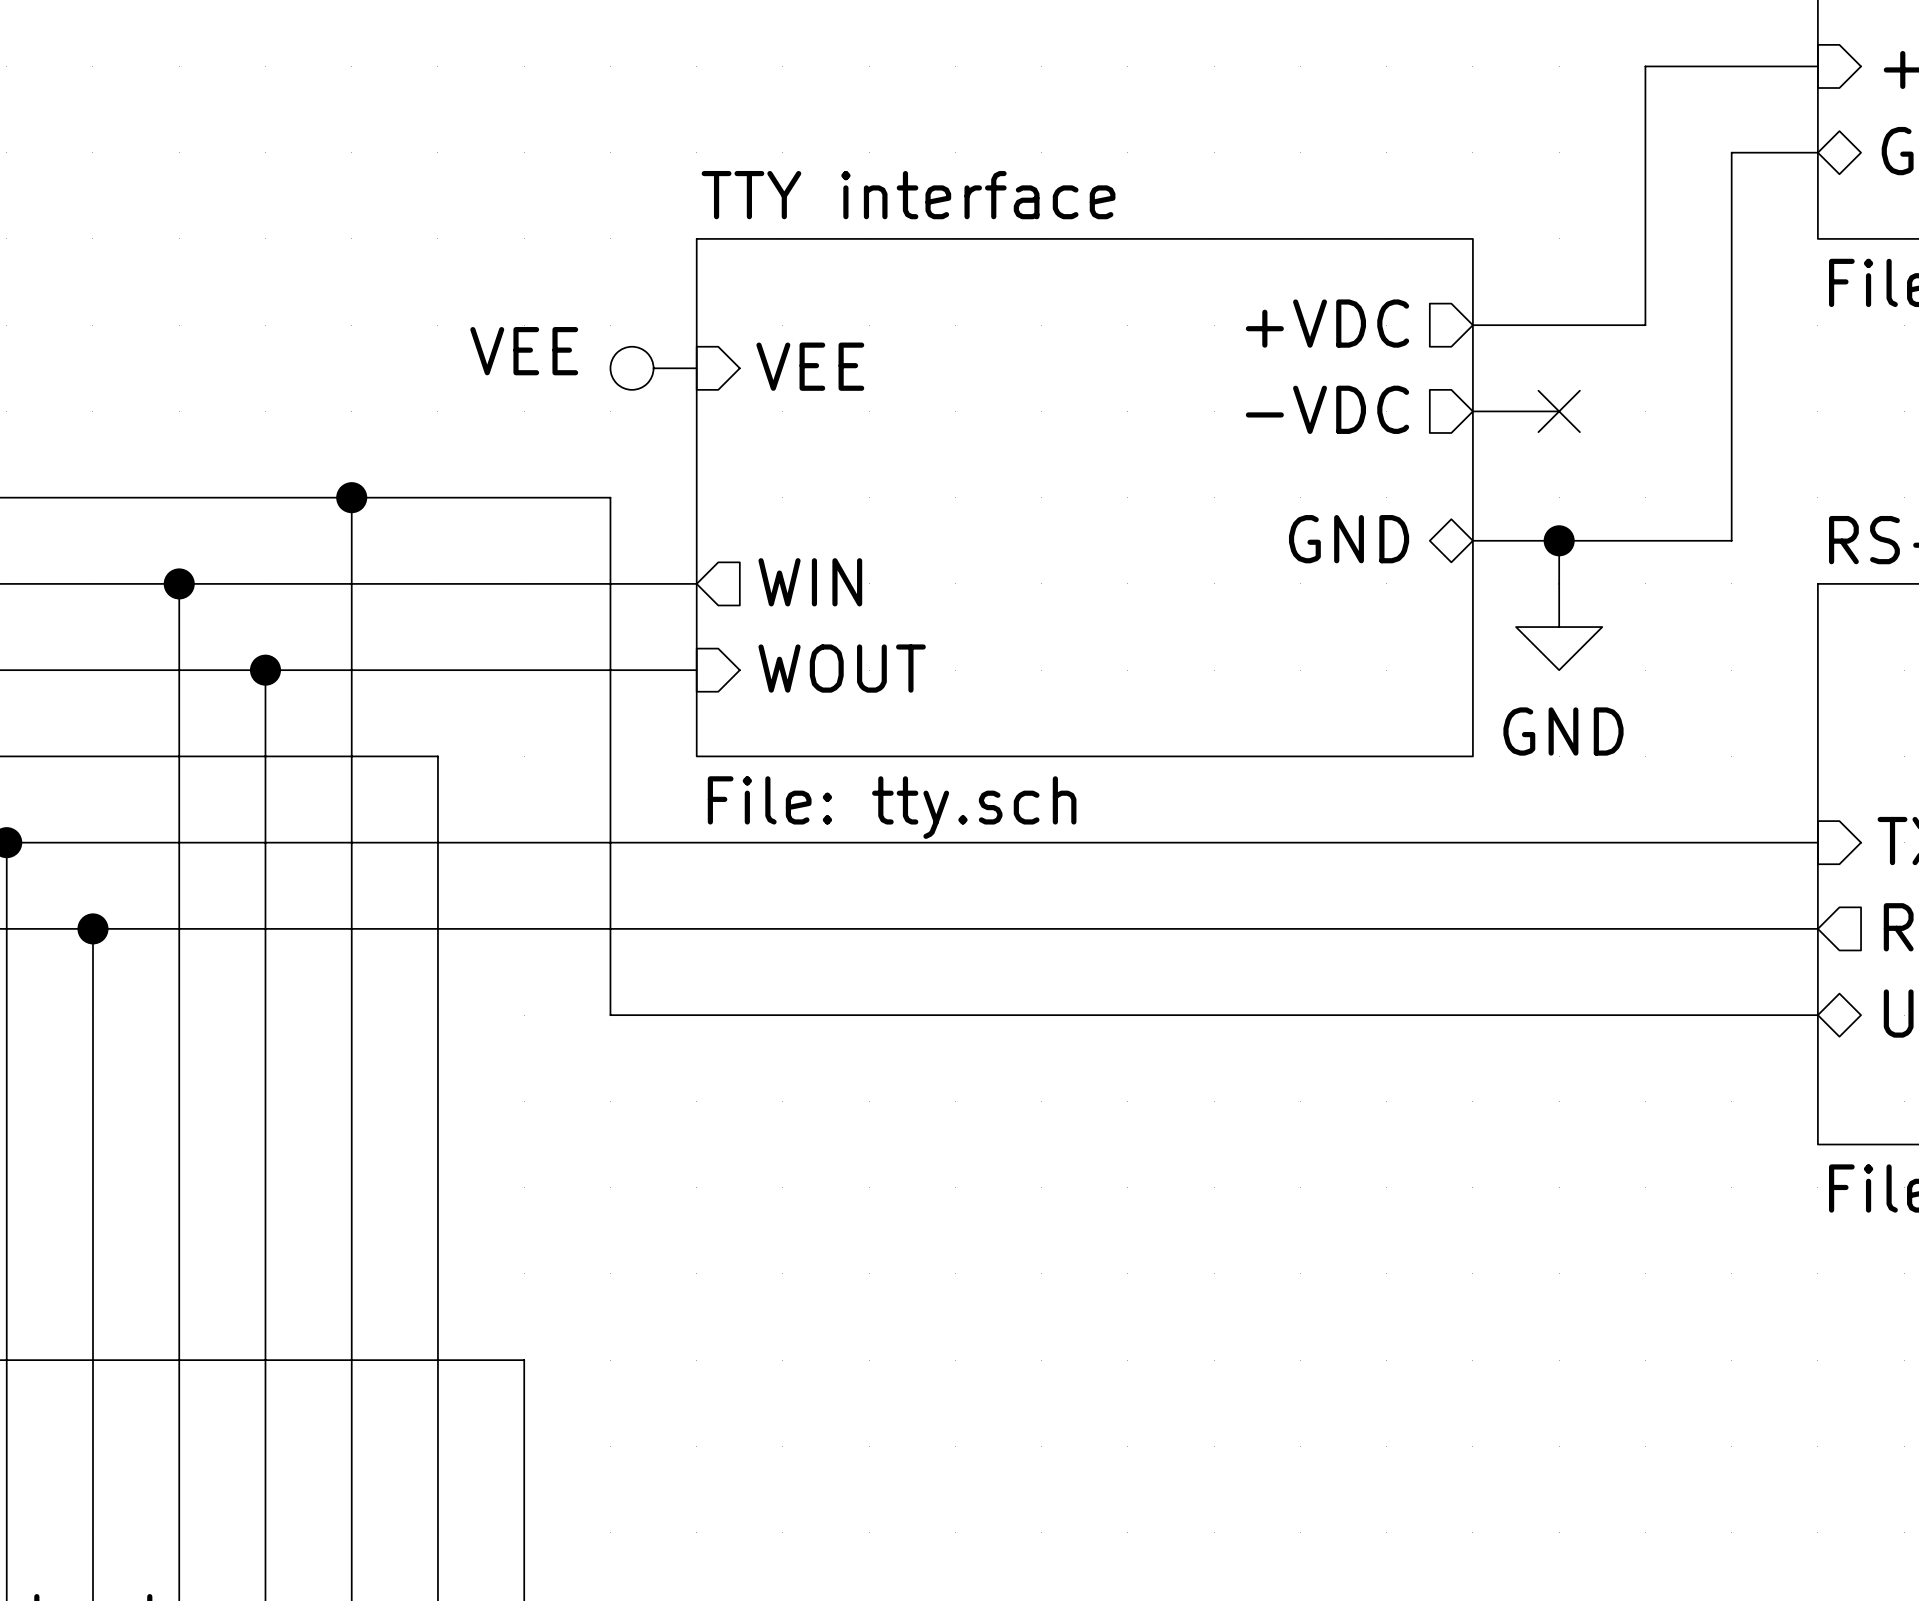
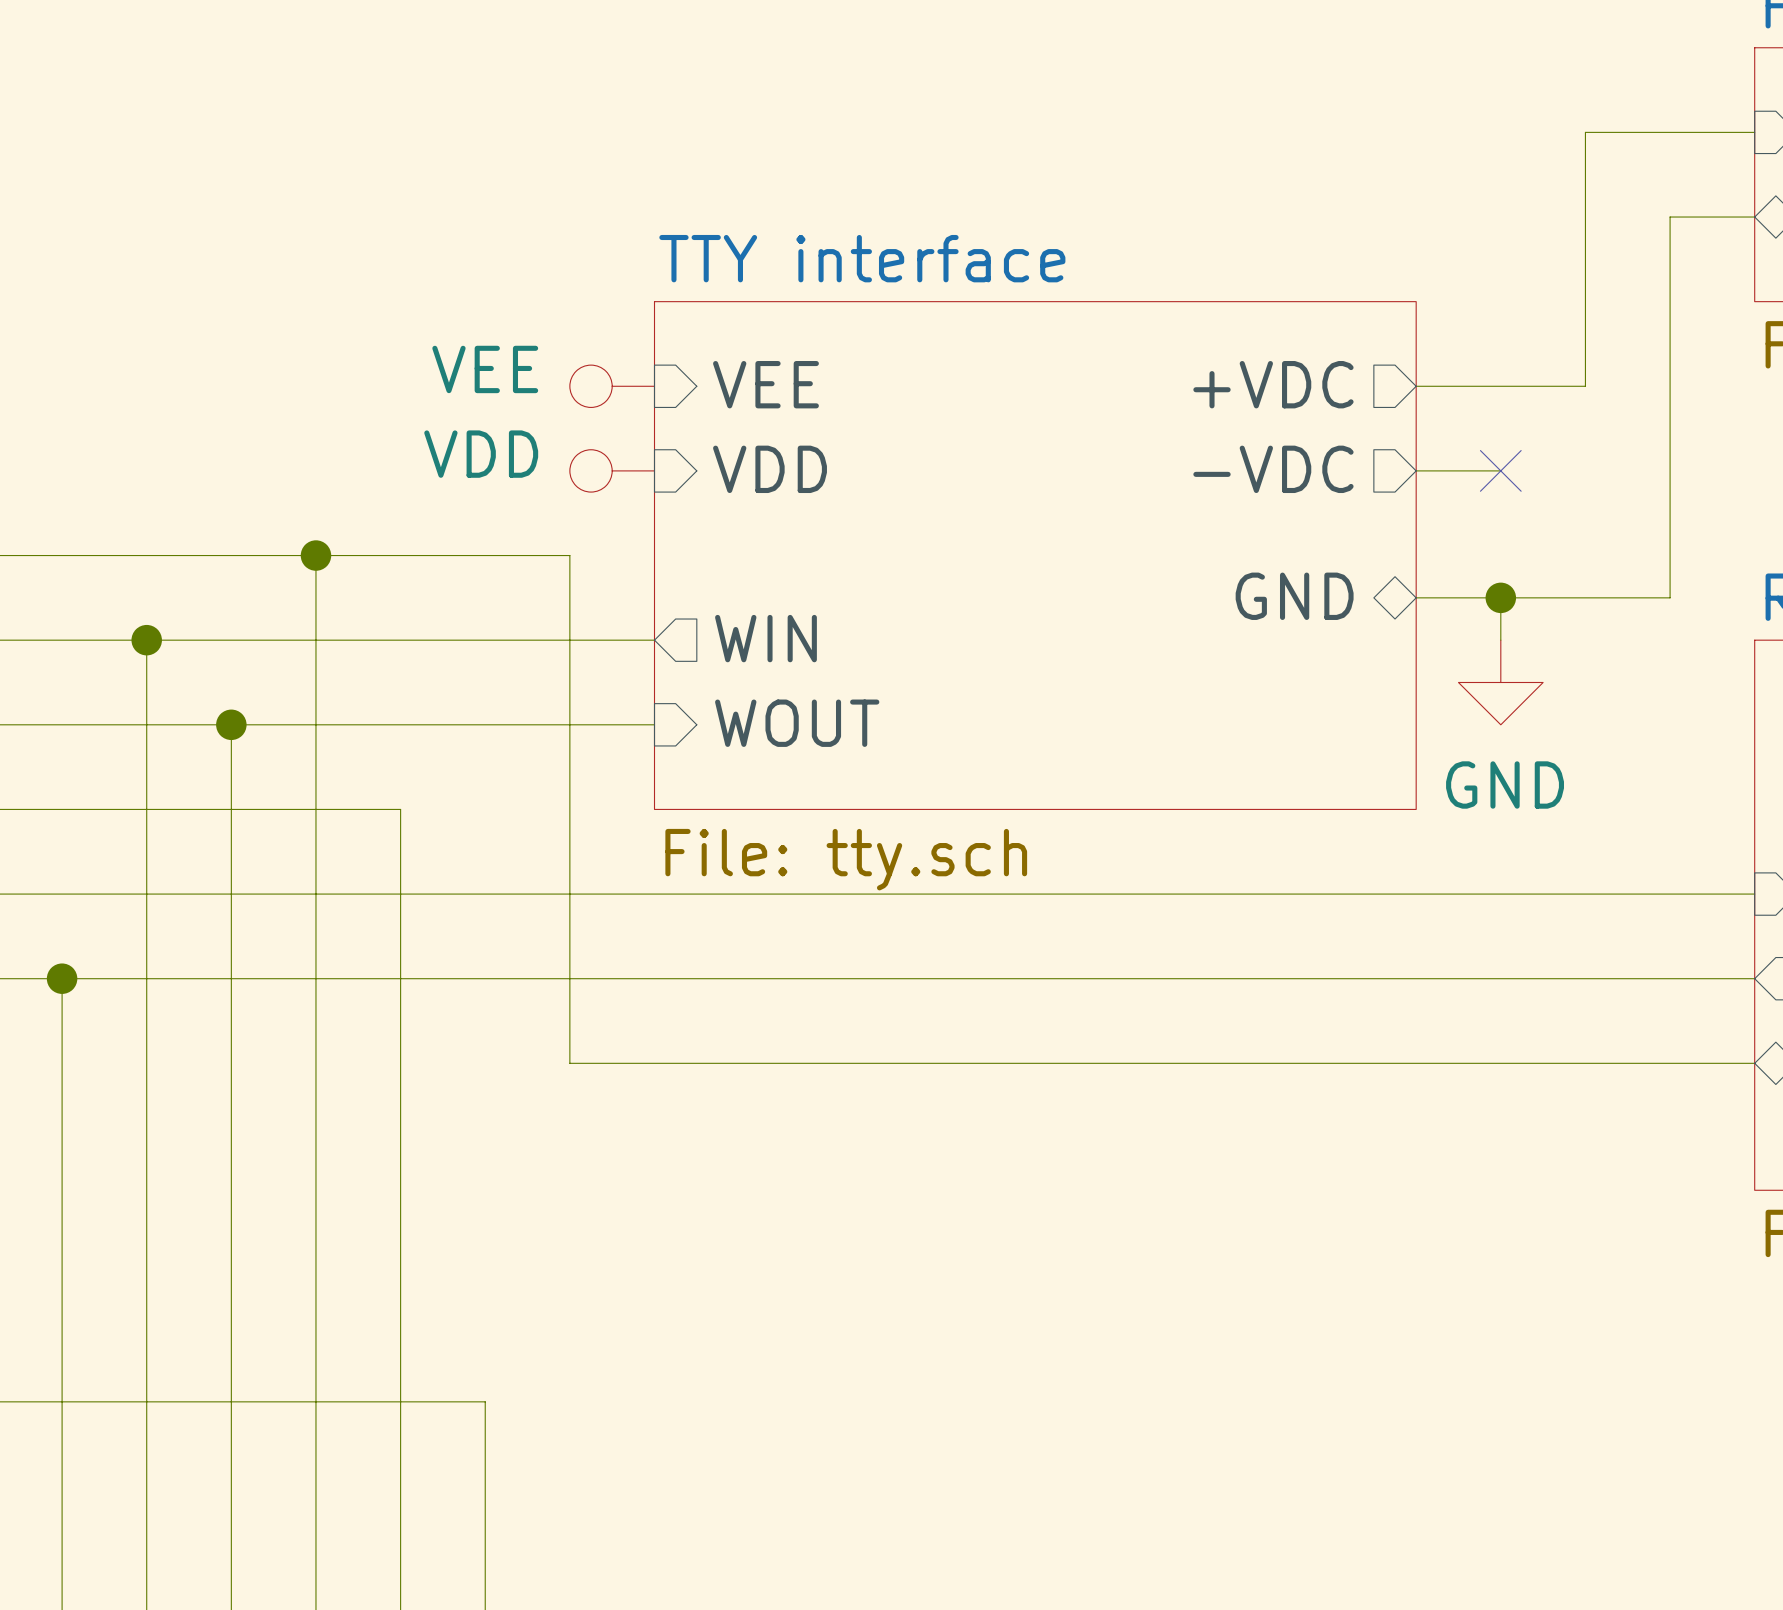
sheet pin position: VEE (810, 366) -> VEE (765, 384)
power symbol position: VEE (653, 368) -> VEE (612, 386)
sheet pin: none -> VDD (770, 469)
power symbol: none -> VDD (612, 470)

